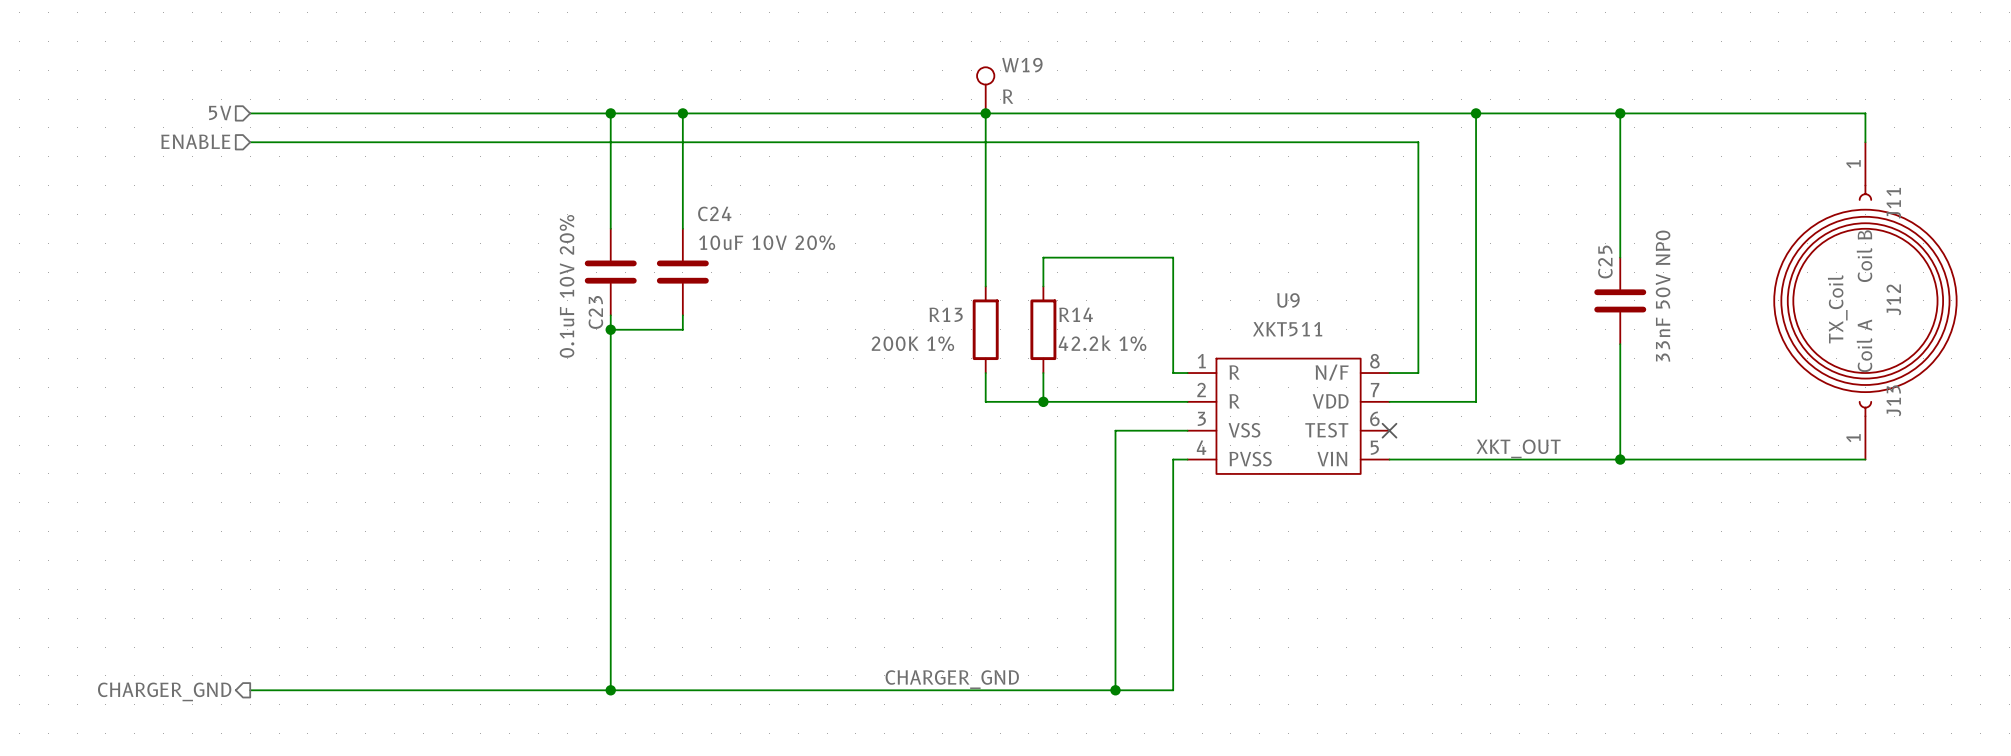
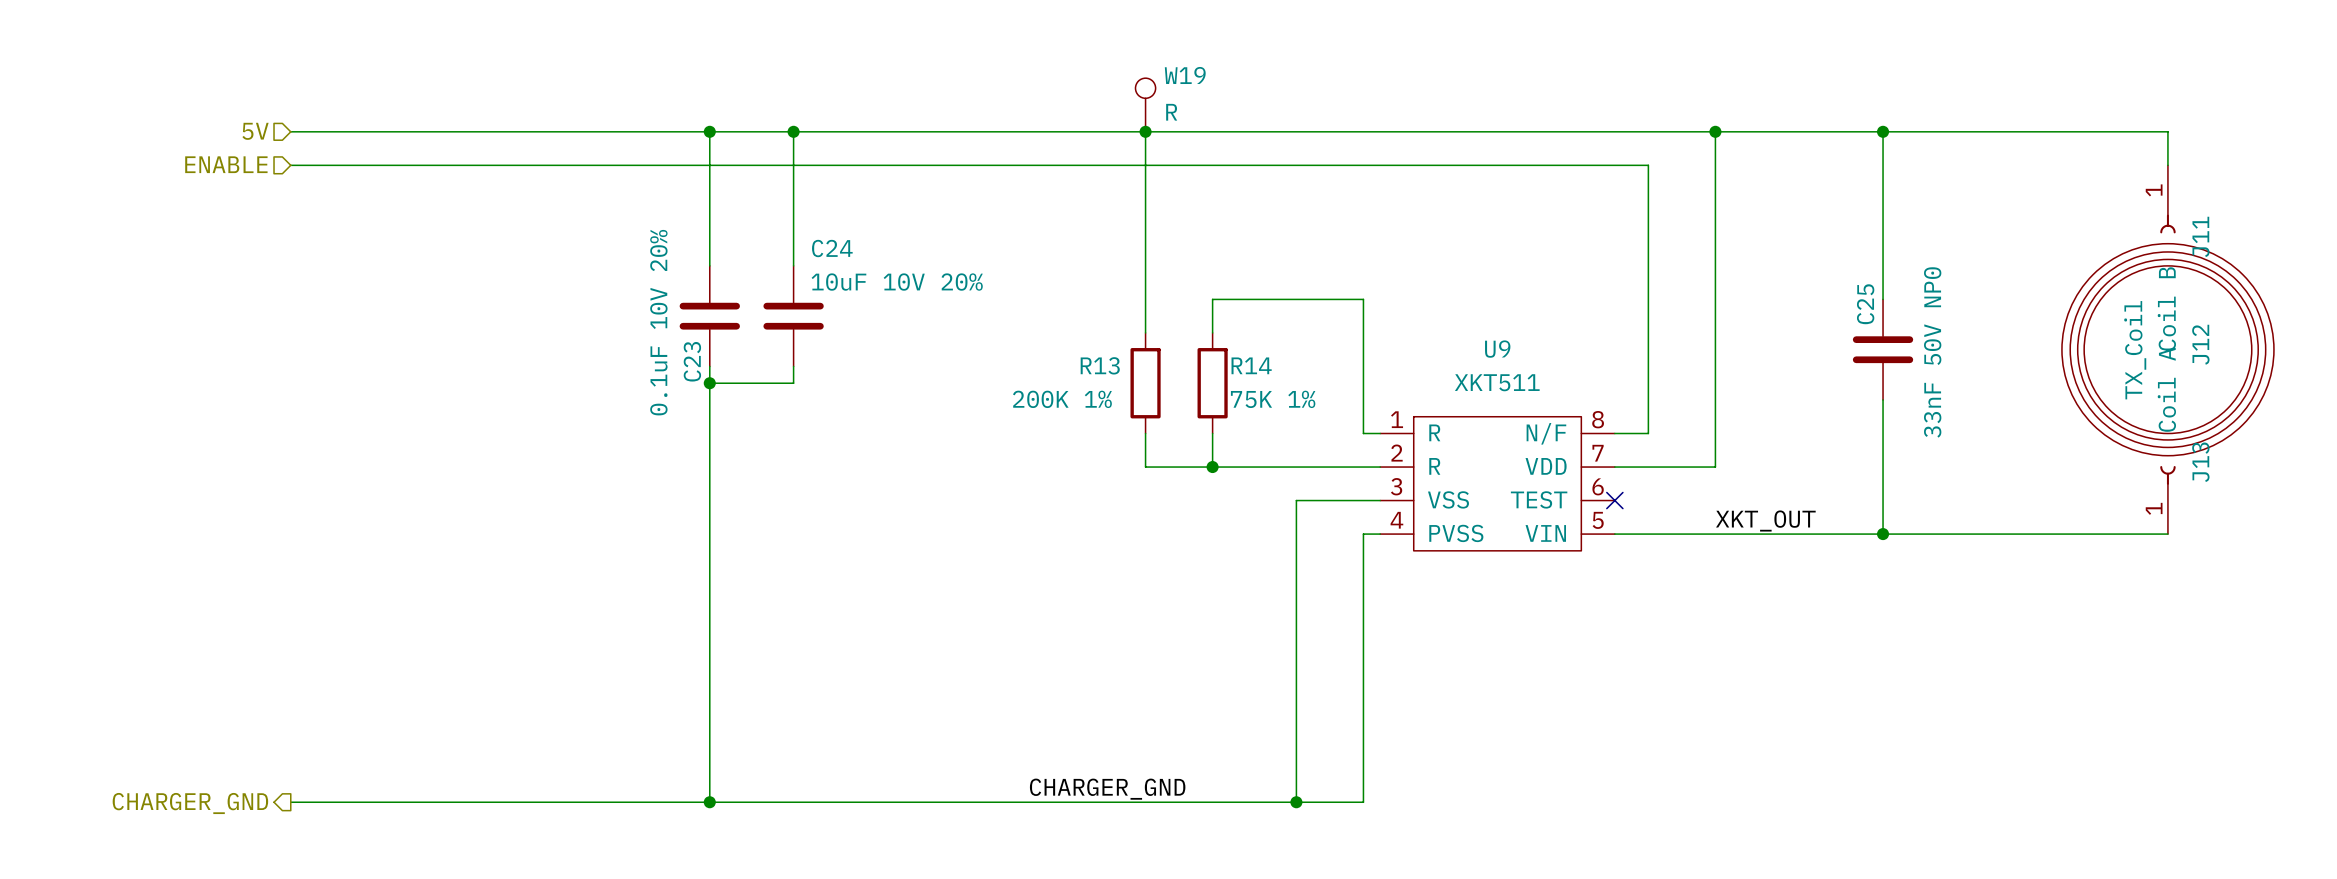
R14 value: 42.2k 1% (1102, 343) -> 75K 1% (1273, 399)

